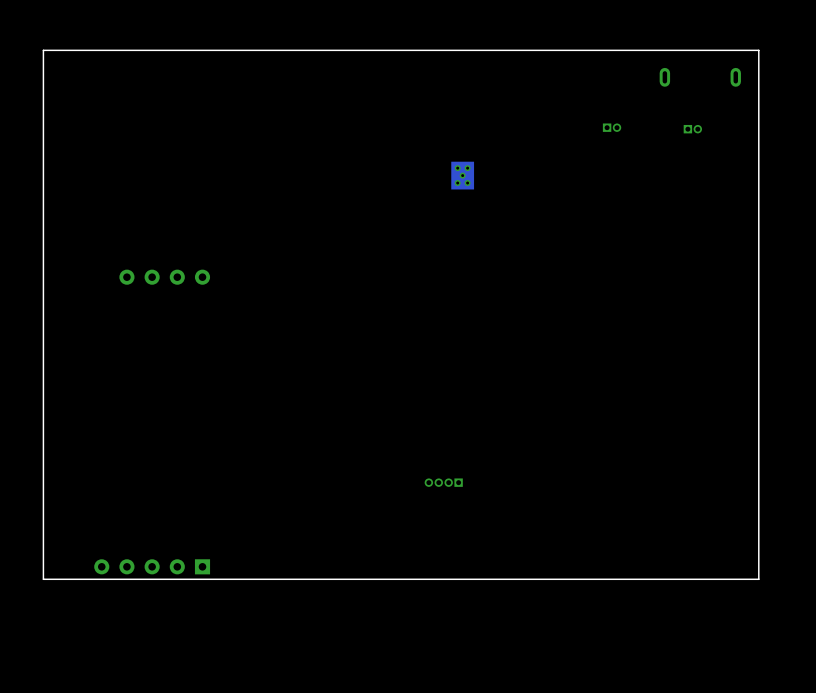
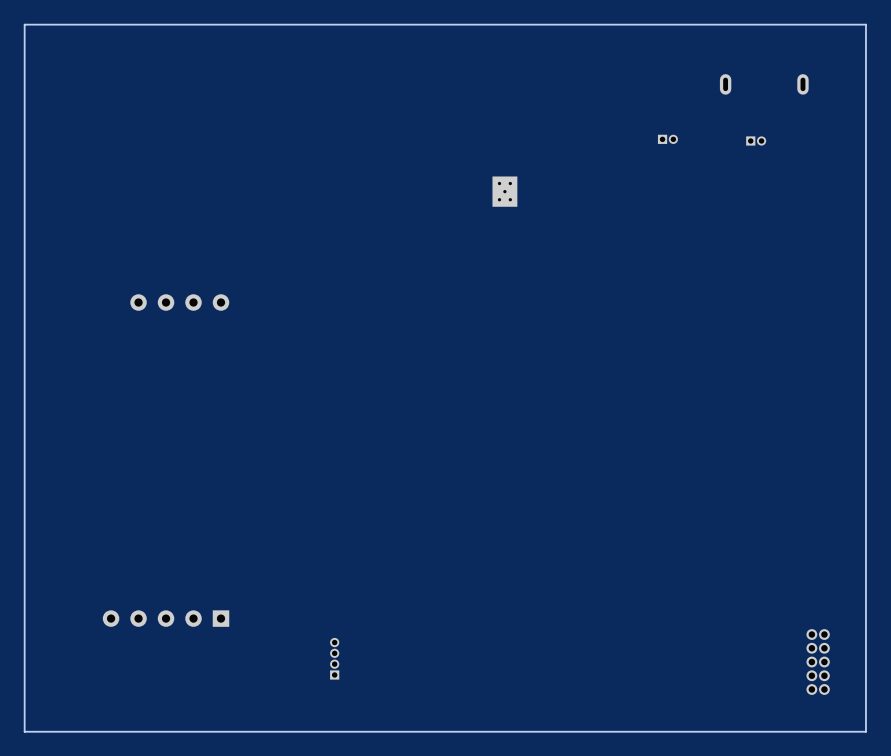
board edge: (758, 50) (43, 50) (43, 579) (758, 579) (758, 50) -> (865, 24) (865, 731) (24, 731) (24, 24) (865, 24)
part rotation: 0° (443, 482) -> 90° clockwise (334, 658)
part position: (443, 482) -> (334, 658)
part: none -> (818, 662)

